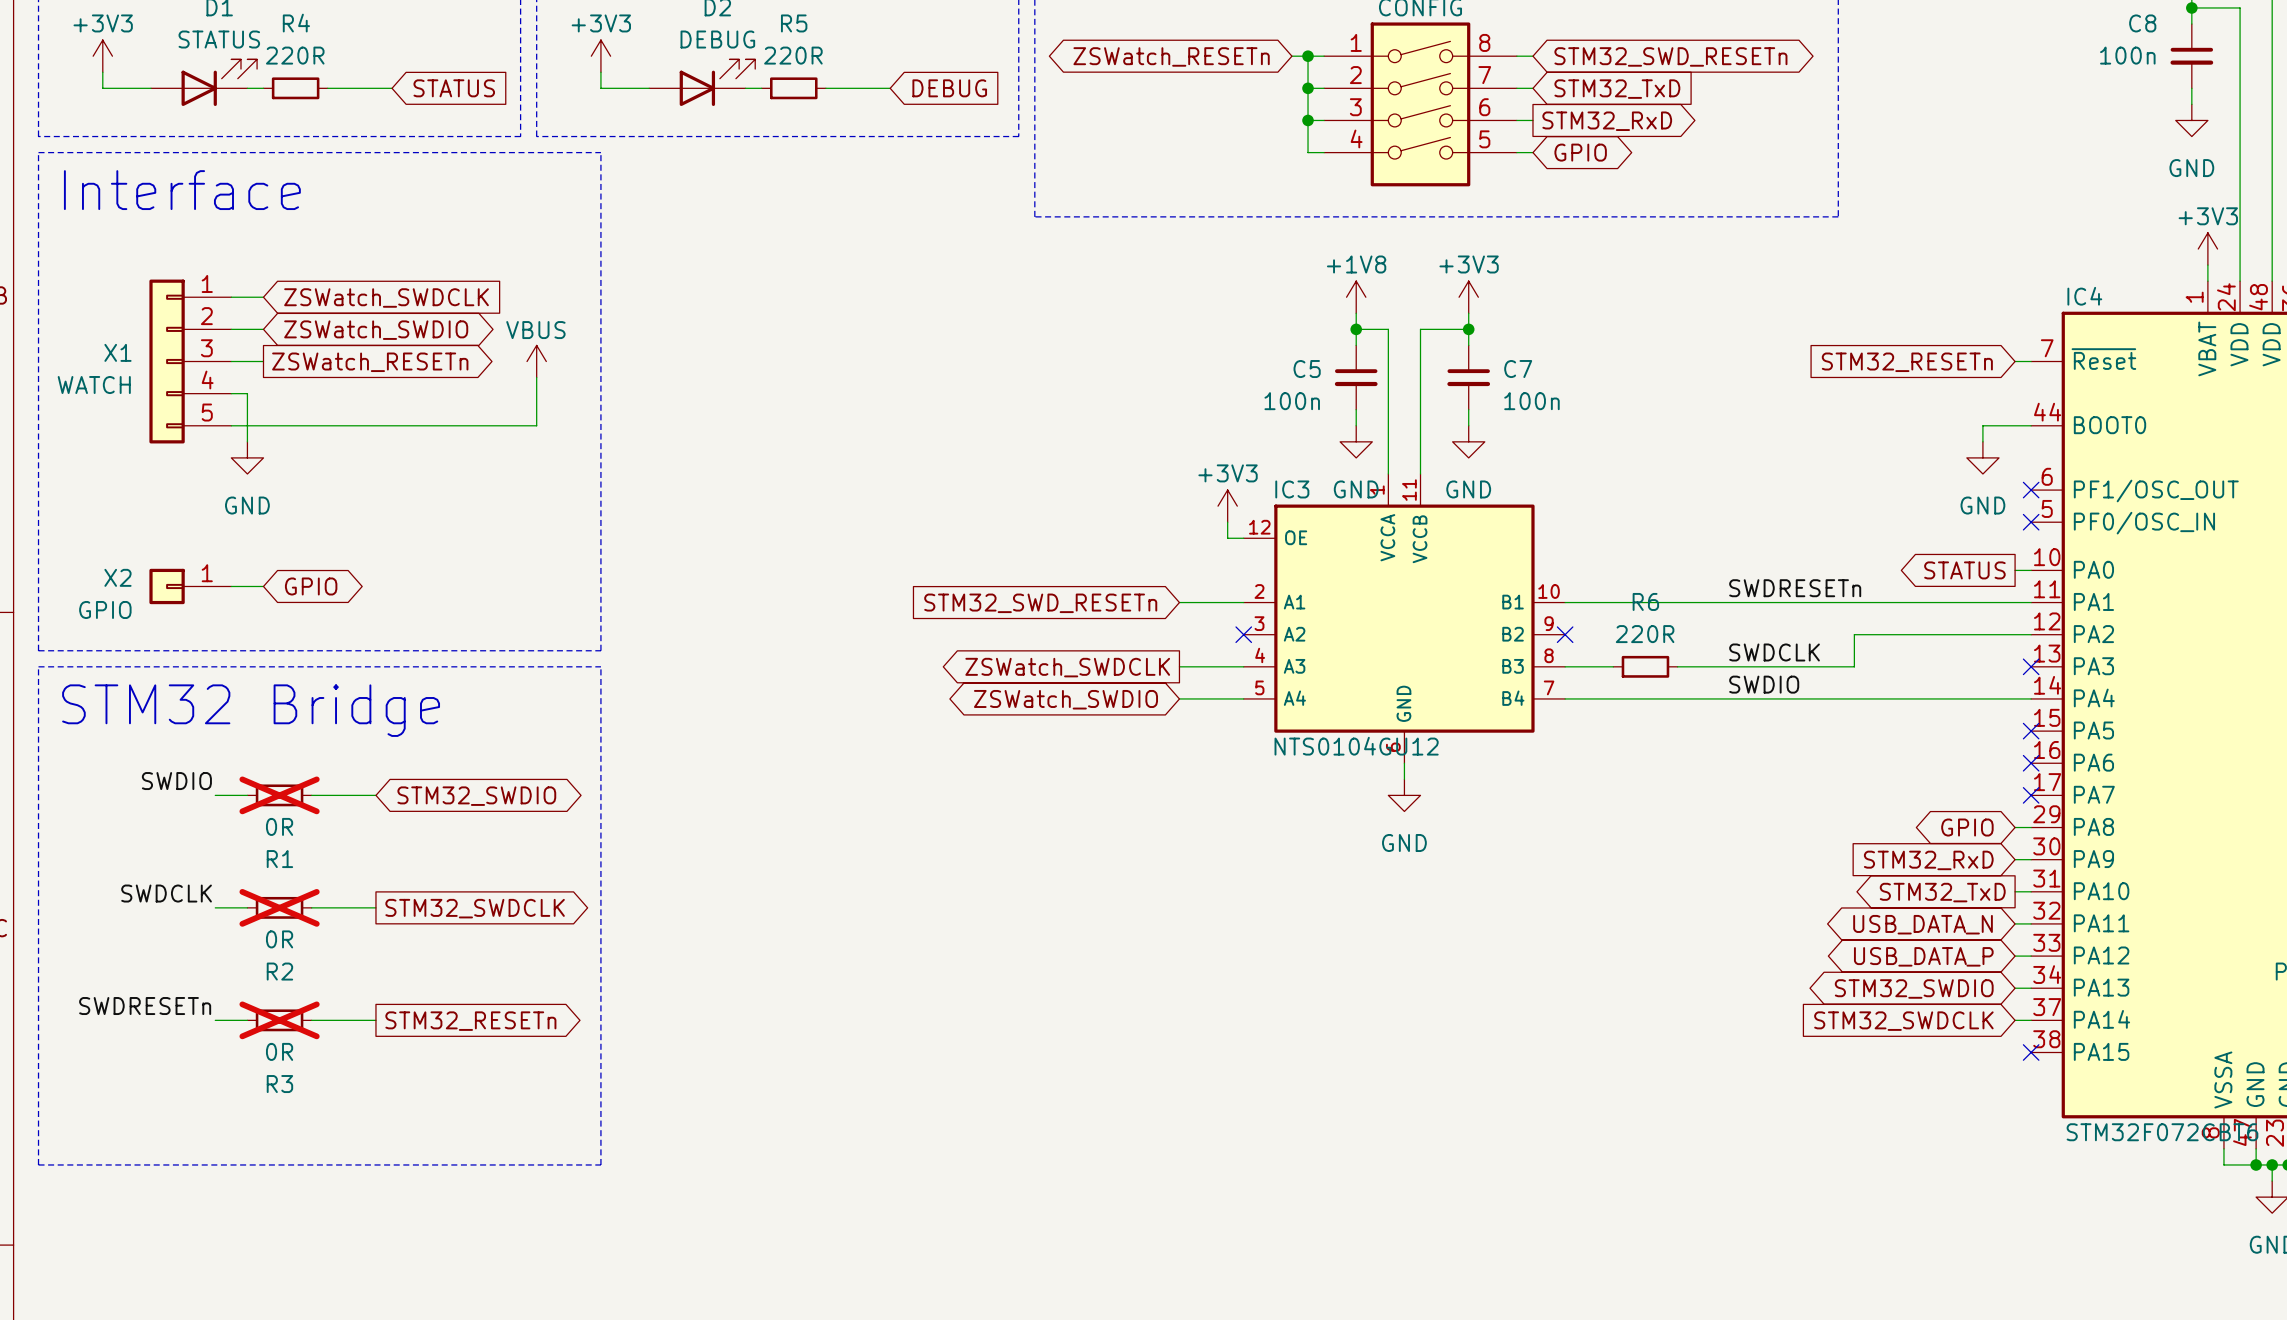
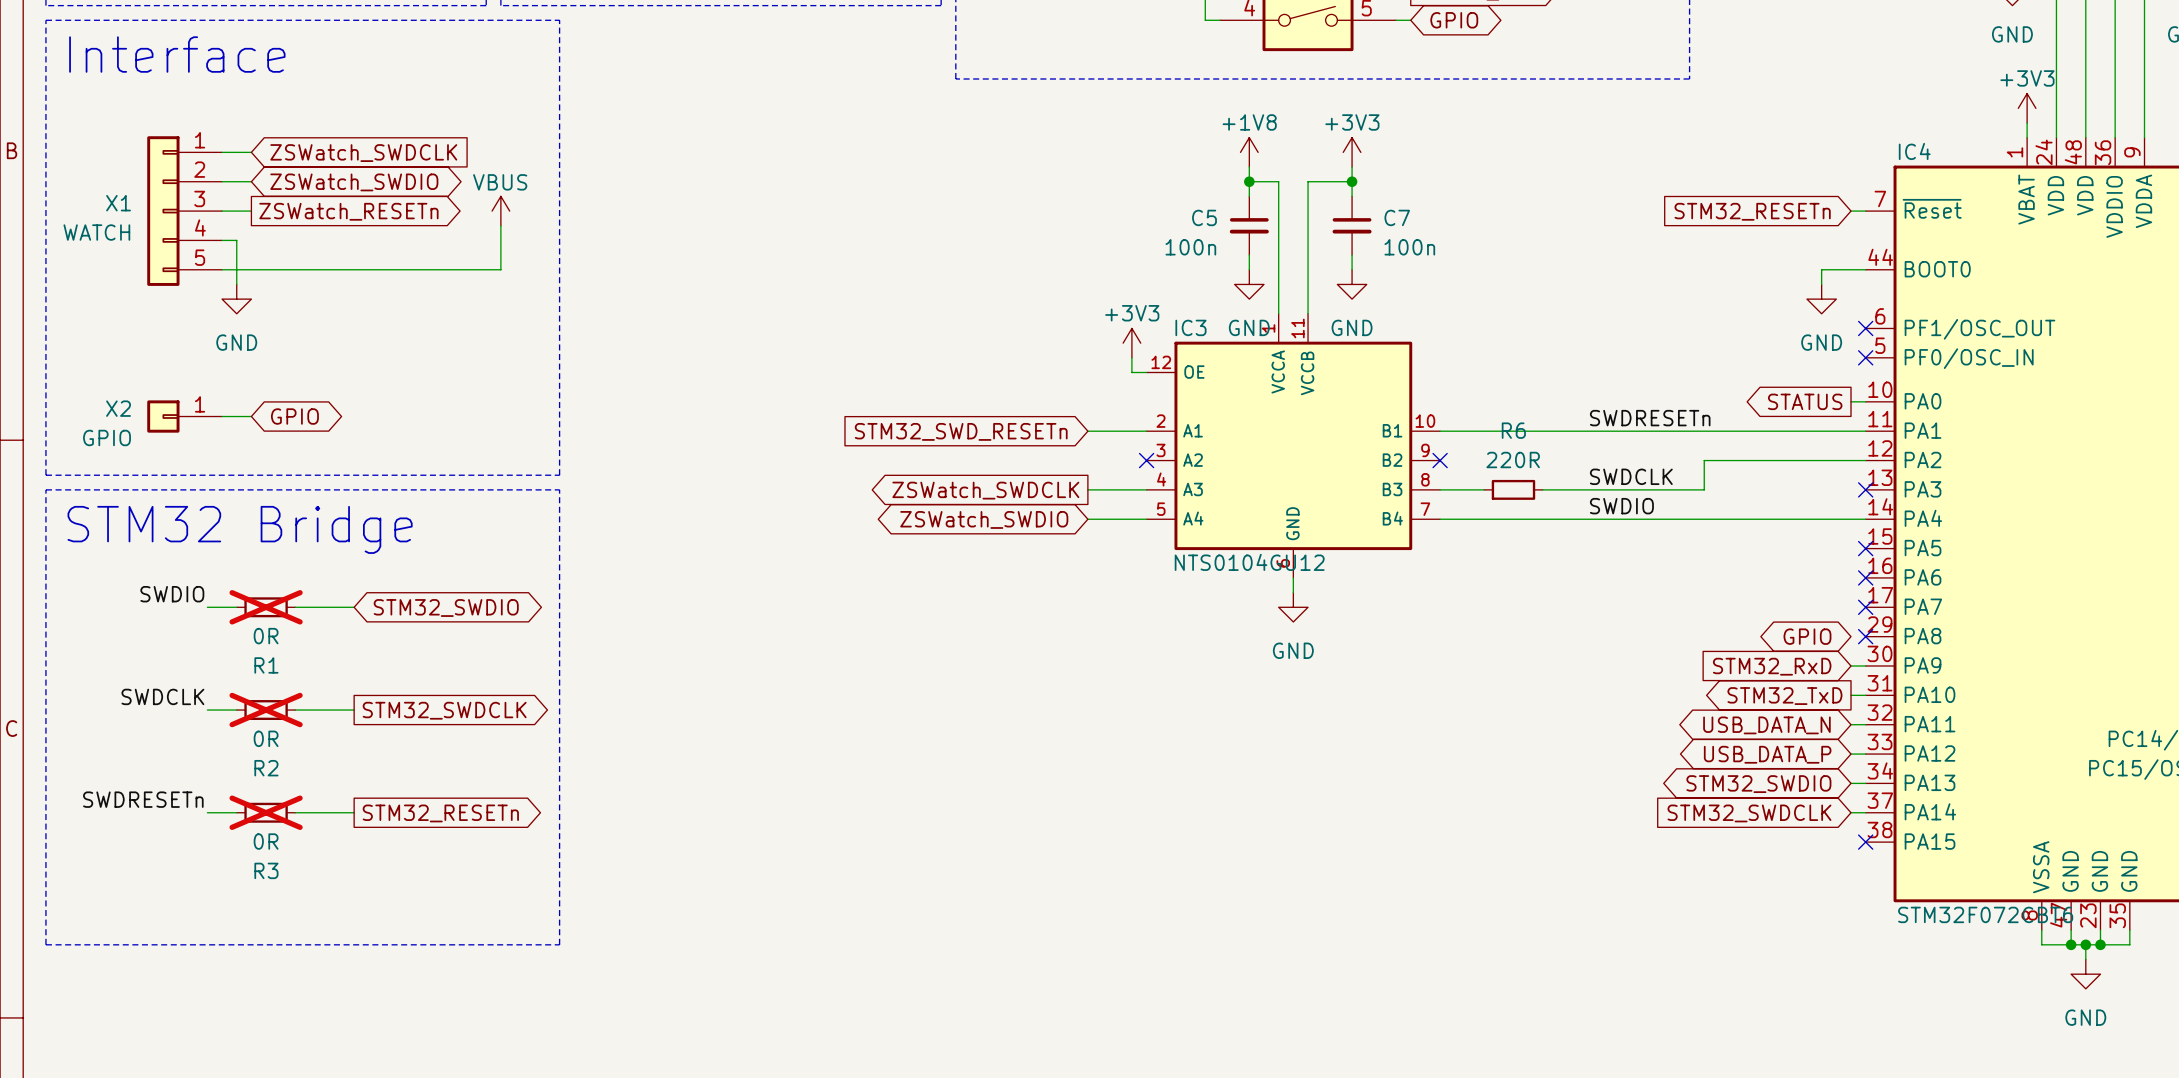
wire: (2015, 827) (2031, 827) -> none
no-connect mark: none -> (1865, 636)

